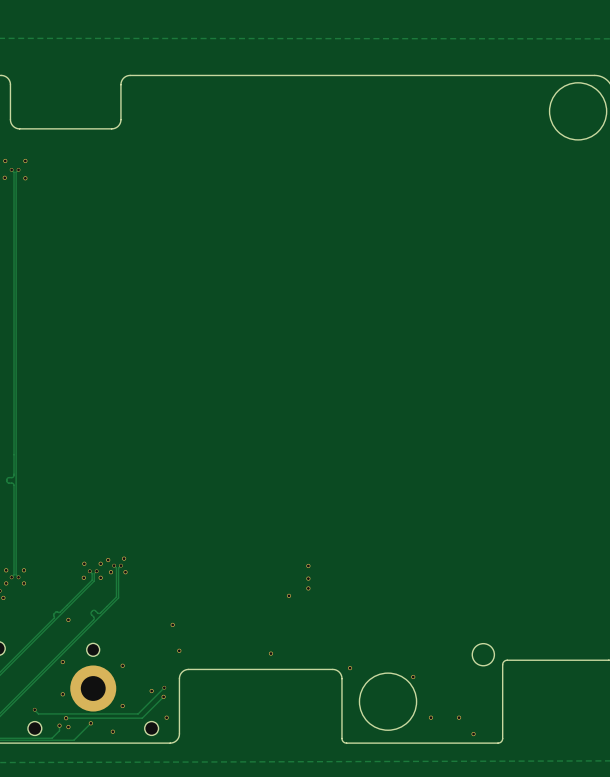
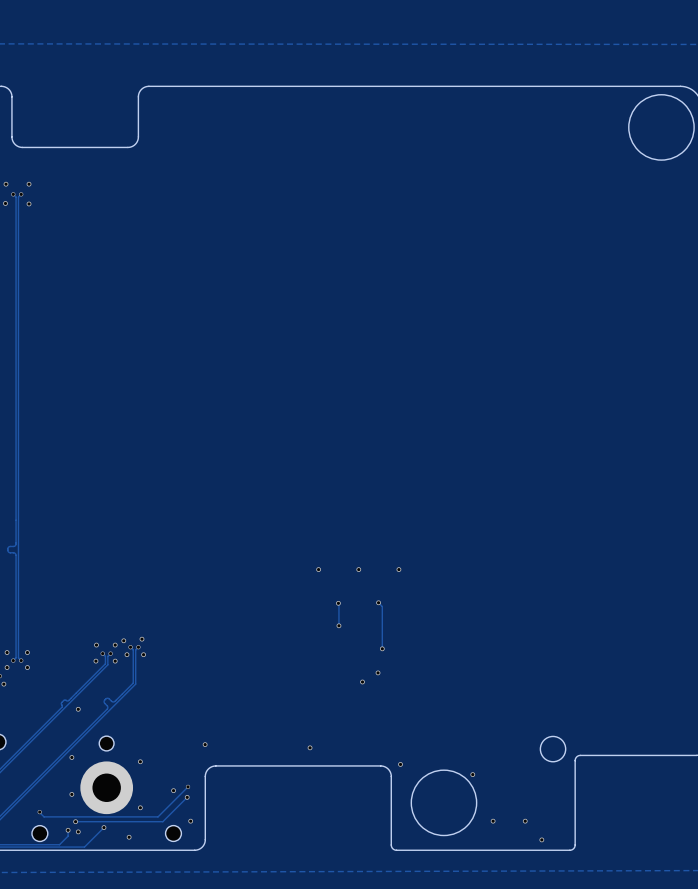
via: none -> (318, 569)
via: none -> (358, 569)
via: none -> (398, 569)
track: none -> (378, 602) (382, 606) (382, 648)
via: none -> (378, 602)
track: none -> (338, 603) (338, 625)
via: none -> (338, 603)
via: none -> (338, 625)
via: (308, 565) -> none
via: none -> (382, 648)
via: (308, 578) -> none
via: (308, 588) -> none
via: none -> (378, 672)
via: (288, 595) -> none
via: none -> (362, 682)
via: (172, 624) -> none

